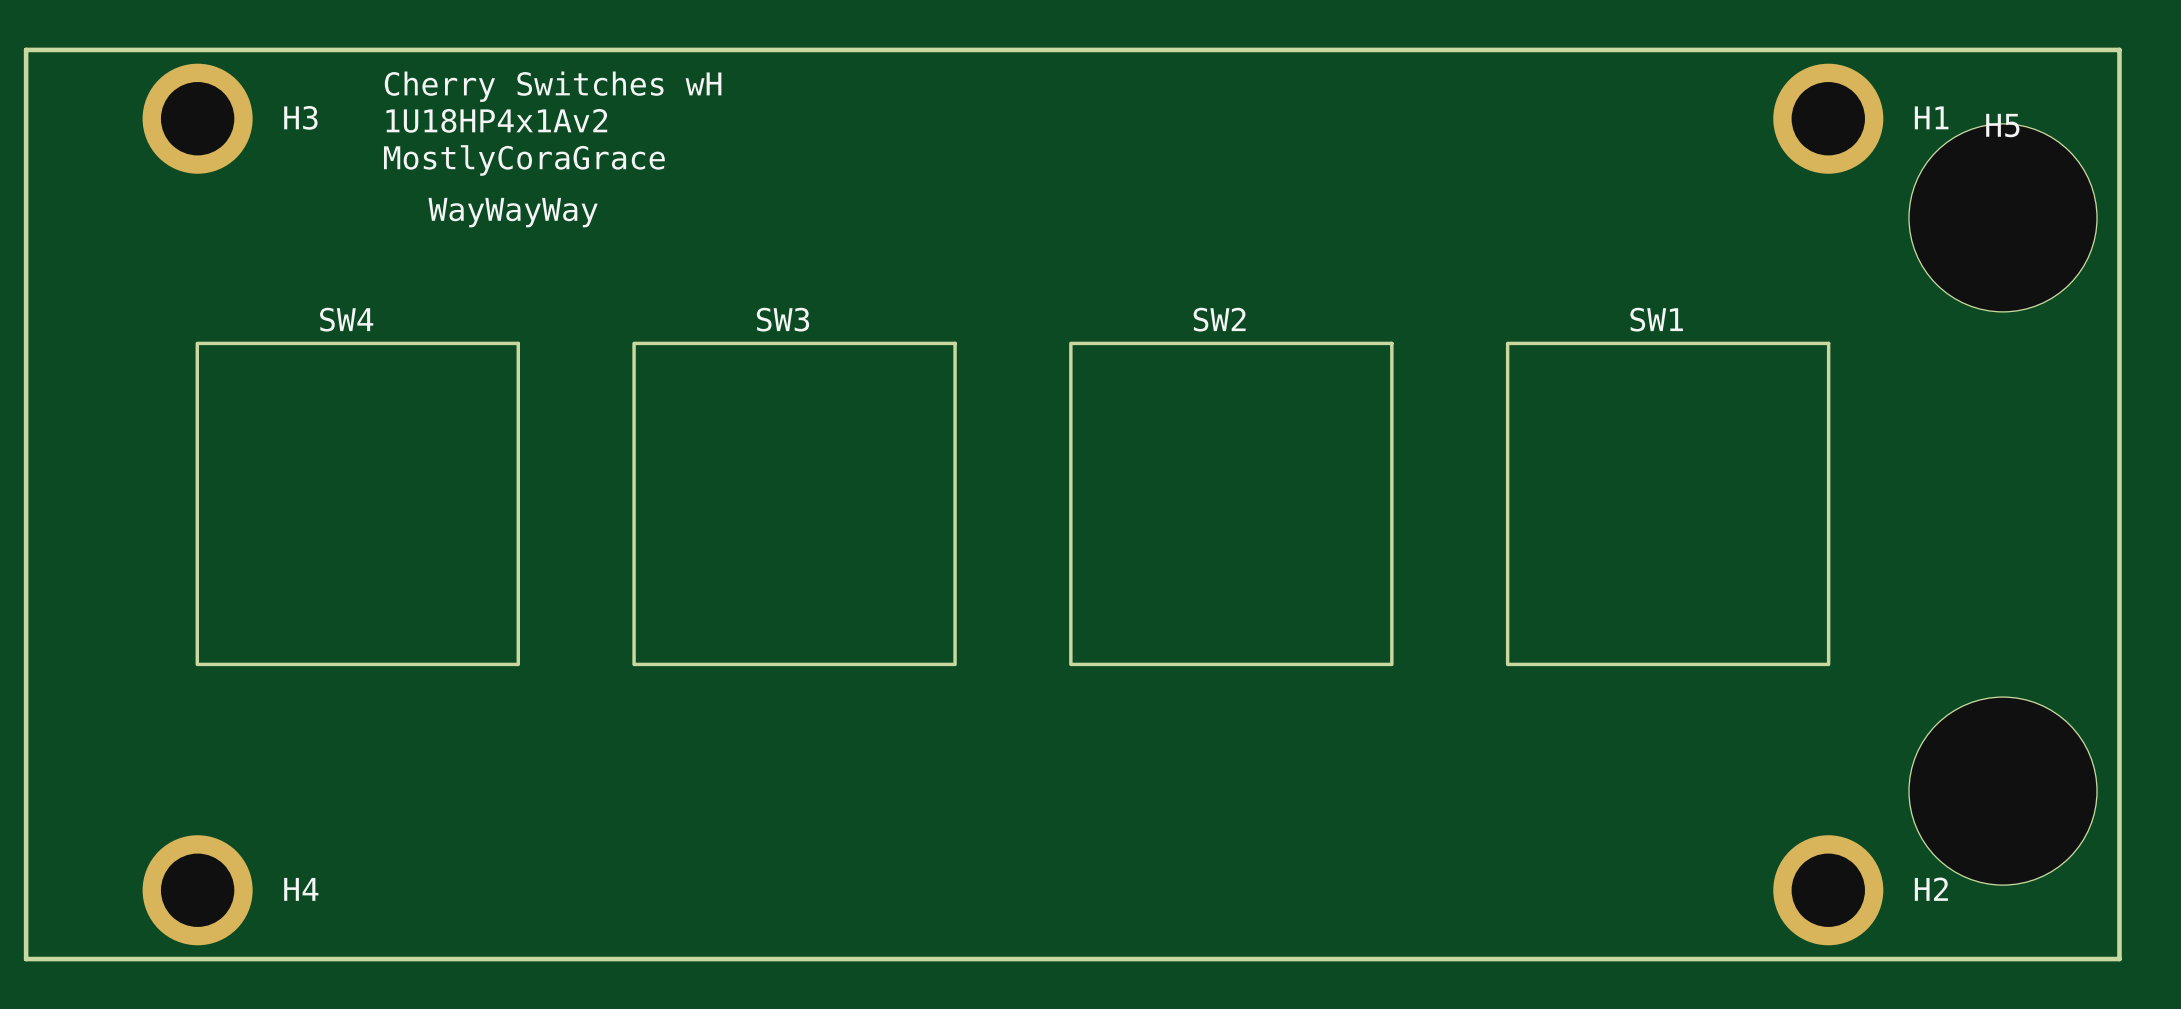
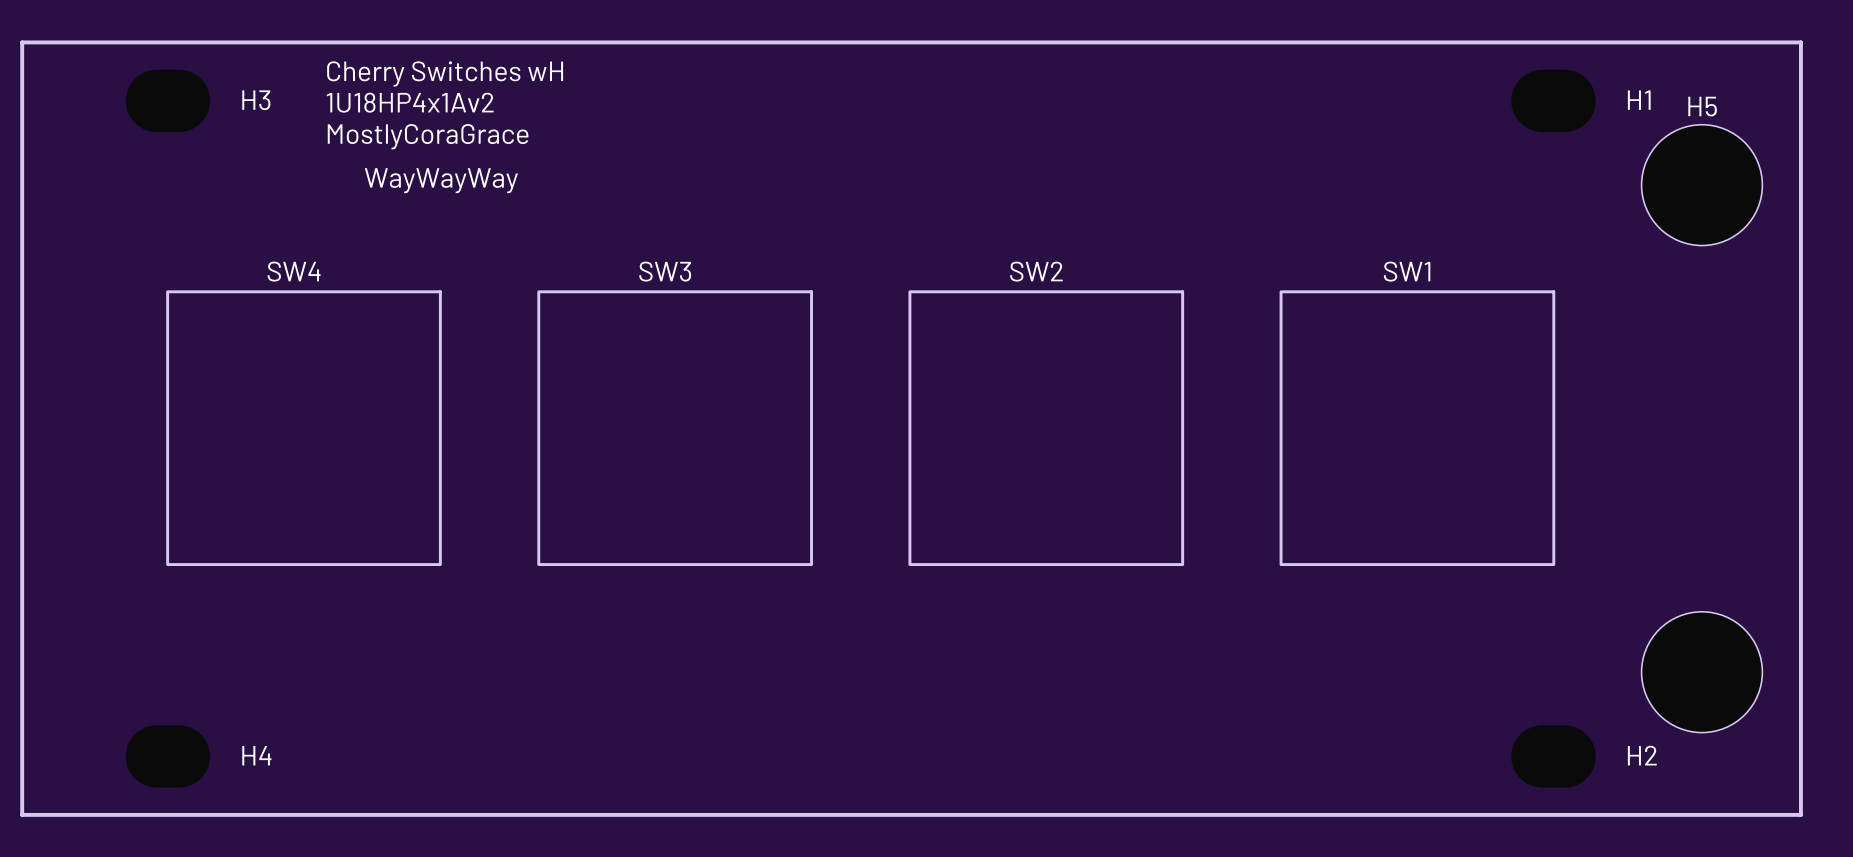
H3 footprint: [142, 63, 253, 174] -> [125, 69, 211, 133]
H1 footprint: [1773, 63, 1884, 174] -> [1511, 69, 1596, 133]
H5 footprint: [1909, 123, 2098, 886] -> [1641, 124, 1763, 733]
H4 footprint: [142, 835, 253, 946] -> [125, 725, 211, 788]
H2 footprint: [1773, 835, 1884, 946] -> [1511, 725, 1596, 788]

